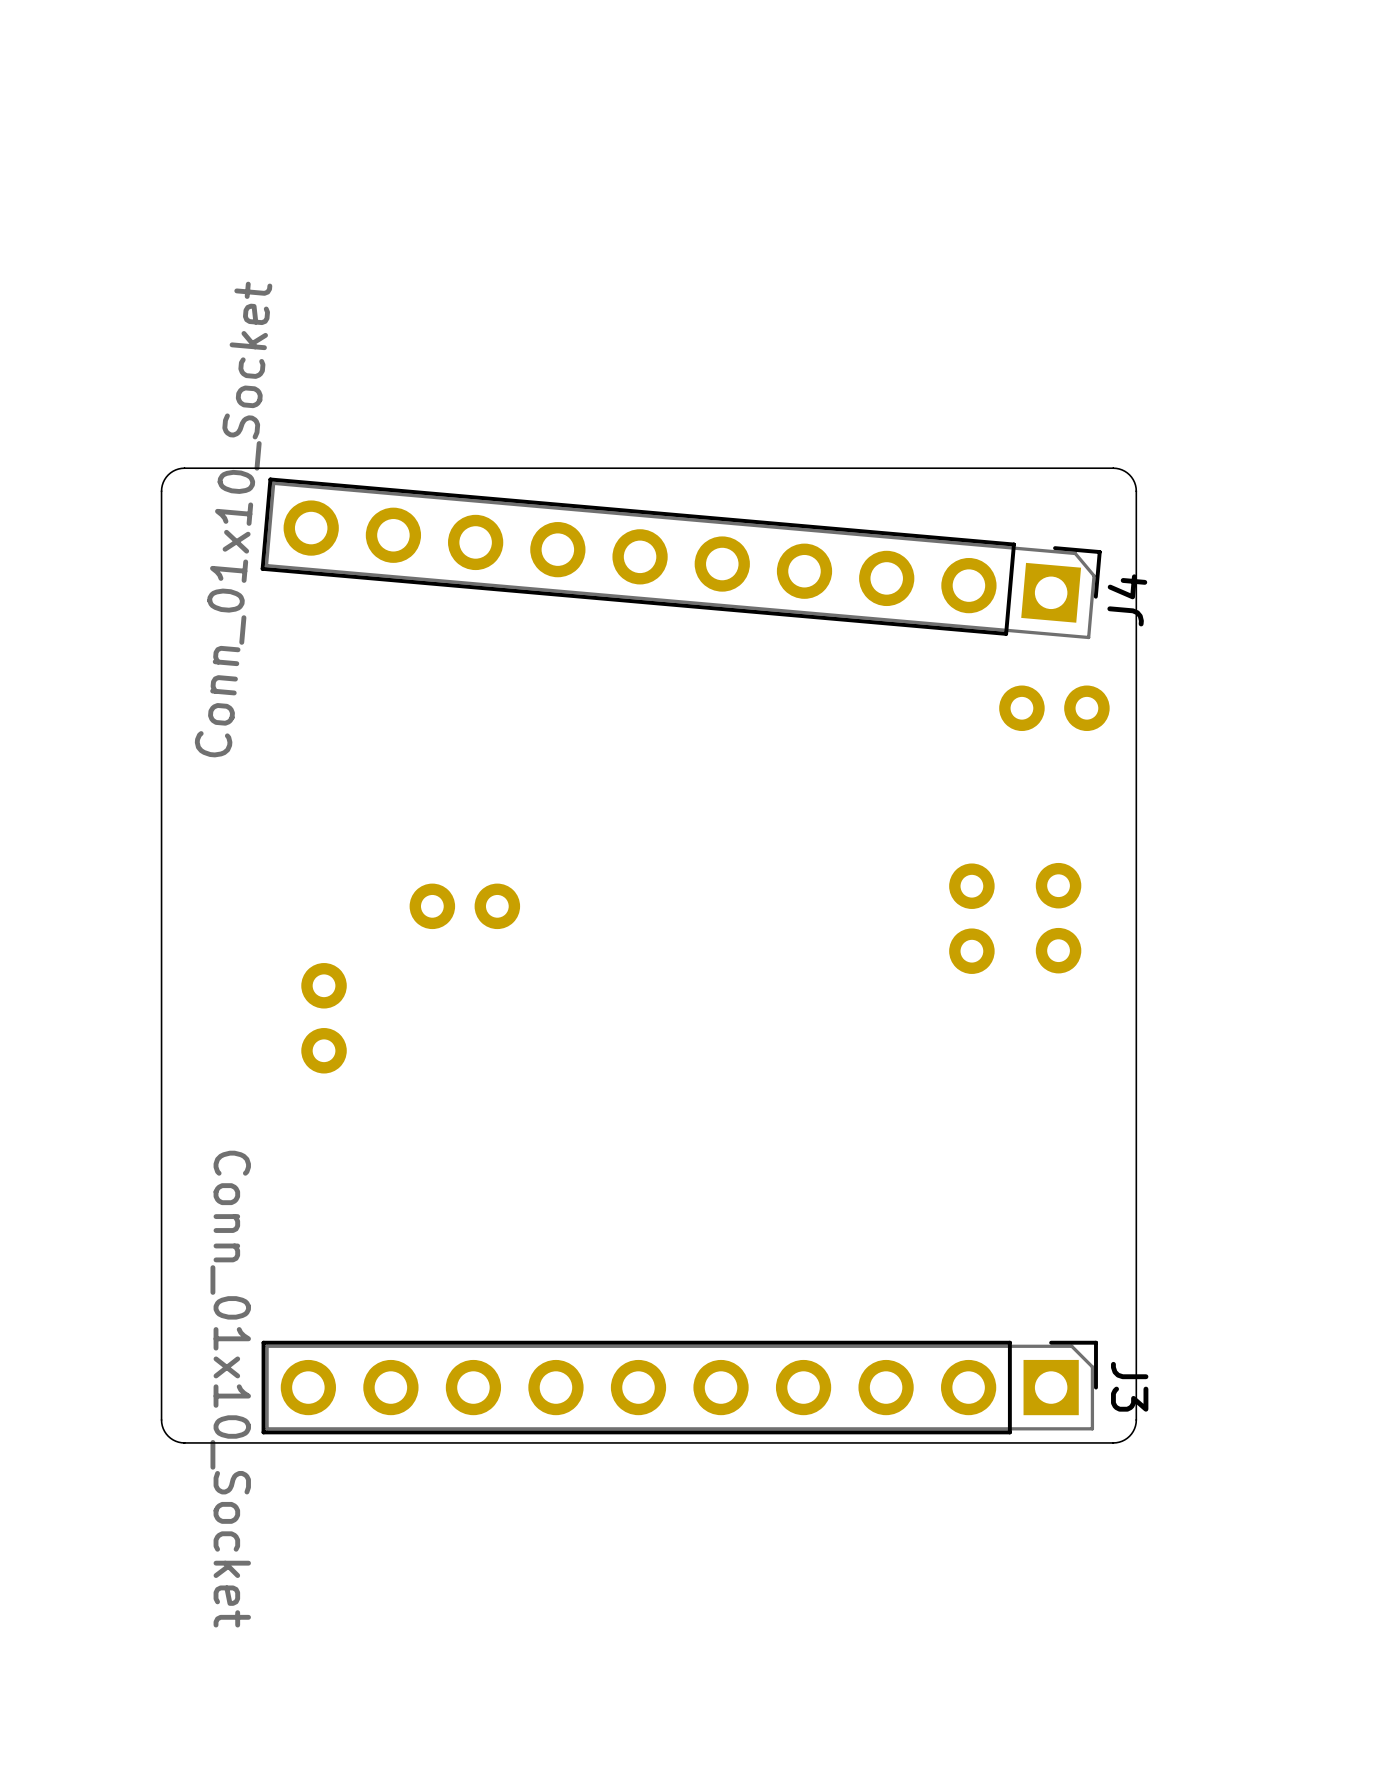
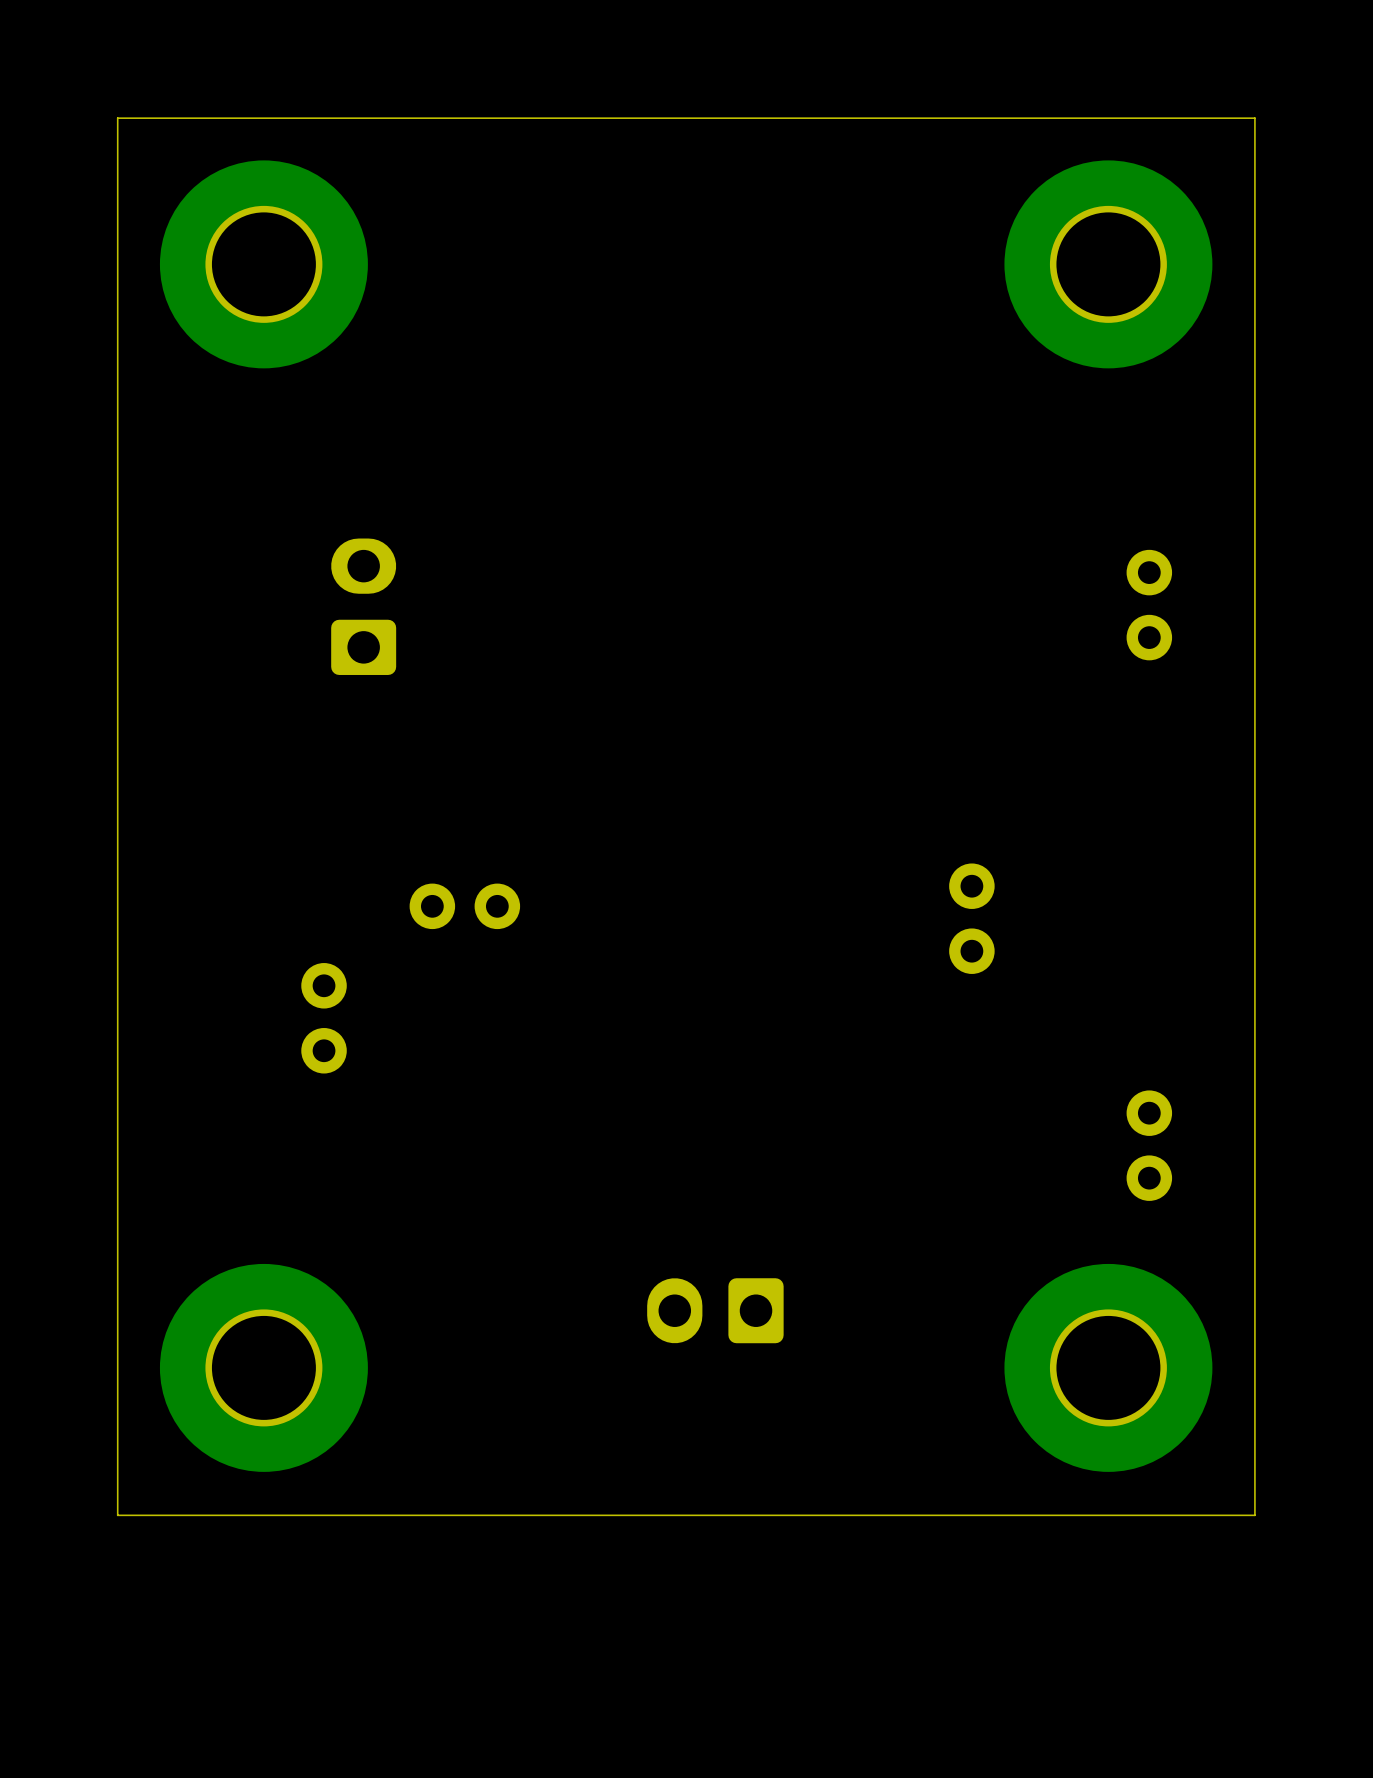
part: none -> (263, 264)
part: none -> (1108, 264)
J4: Conn_01x10_Socket (681, 558) -> none
part: none -> (363, 606)
part rotation: 0° (1054, 708) -> 90° clockwise (1149, 605)
part position: (1054, 708) -> (1149, 605)
part: (1058, 918) -> none
part: none -> (1149, 1145)
part: none -> (715, 1310)
part: none -> (263, 1367)
part: none -> (1108, 1367)
J3: Conn_01x10_Socket (679, 1387) -> none
board edge: (184, 1442) (181, 1442) (178, 1442) (175, 1441) (168, 1436) (163, 1428) (161, 1419) (161, 491) (163, 482) (168, 474) (175, 469) (184, 468) (1113, 468) (1122, 469) (1129, 474) (1134, 482) (1136, 491) (1136, 1419) (1134, 1428) (1129, 1436) (1122, 1441) (1113, 1442) (184, 1442) -> (1254, 118) (1254, 1515) (117, 1515) (117, 118) (1254, 118)

